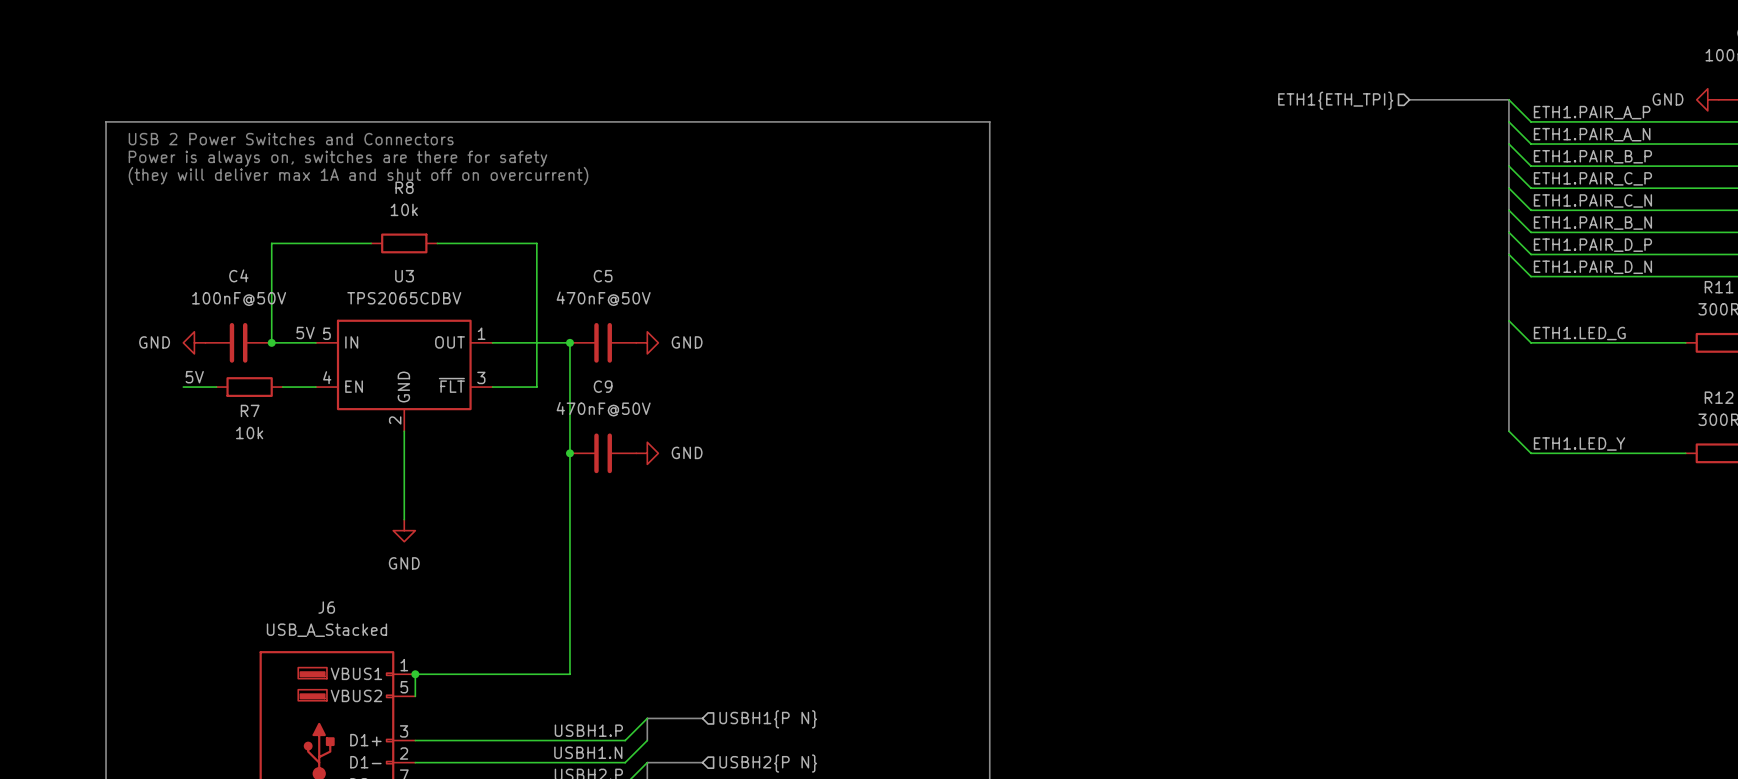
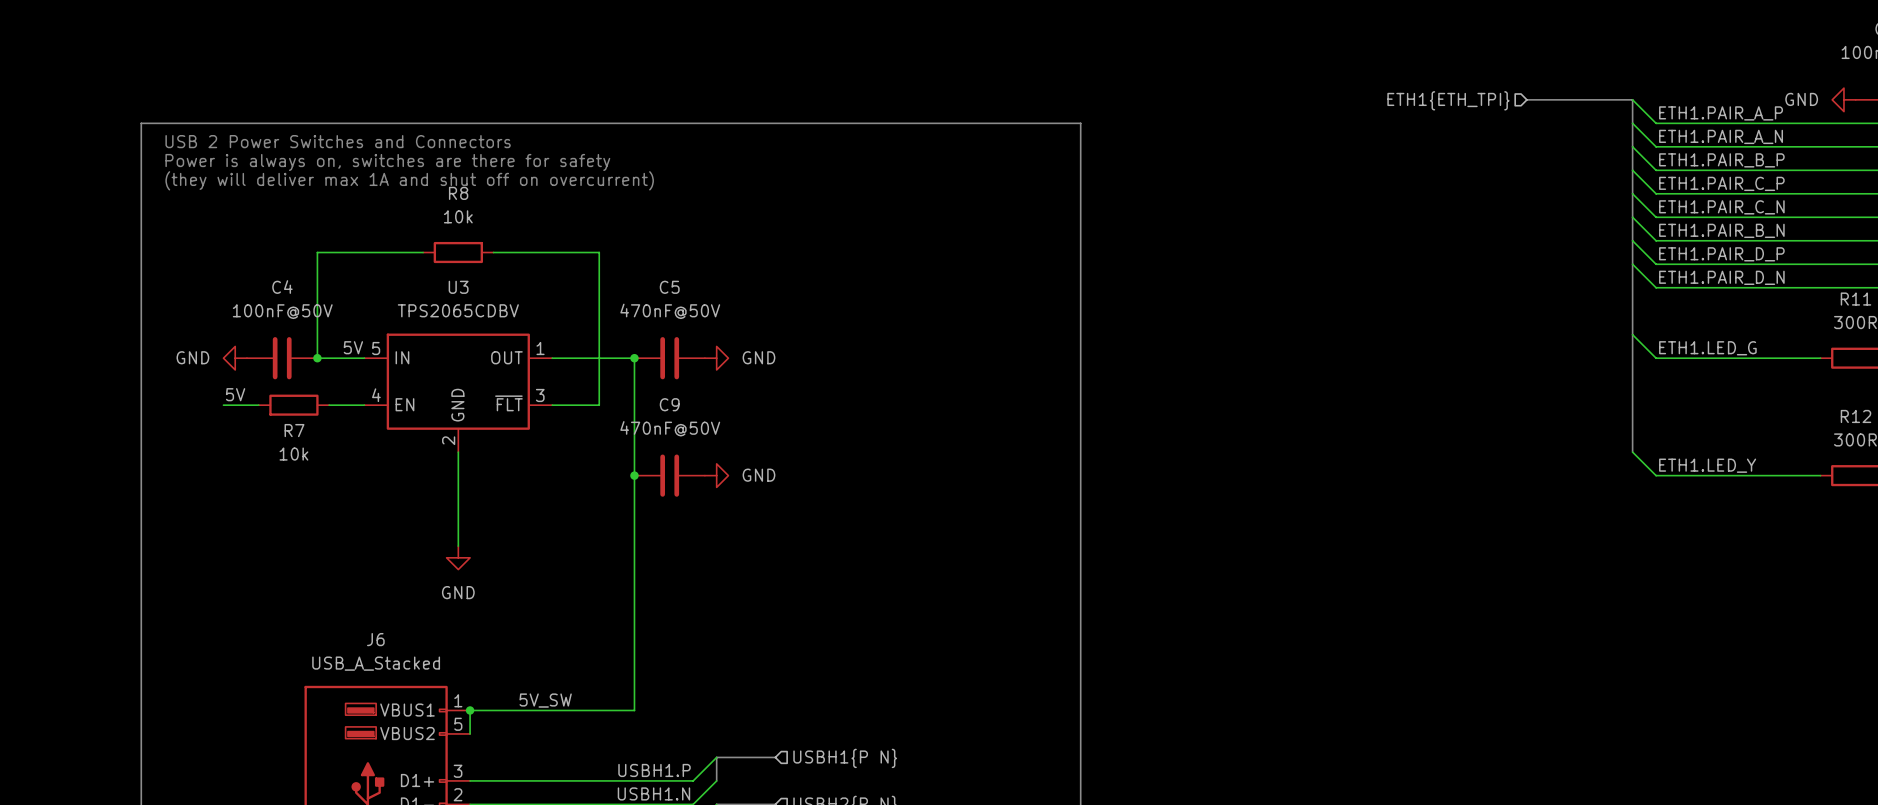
label: none -> 5V_SW (545, 700)

